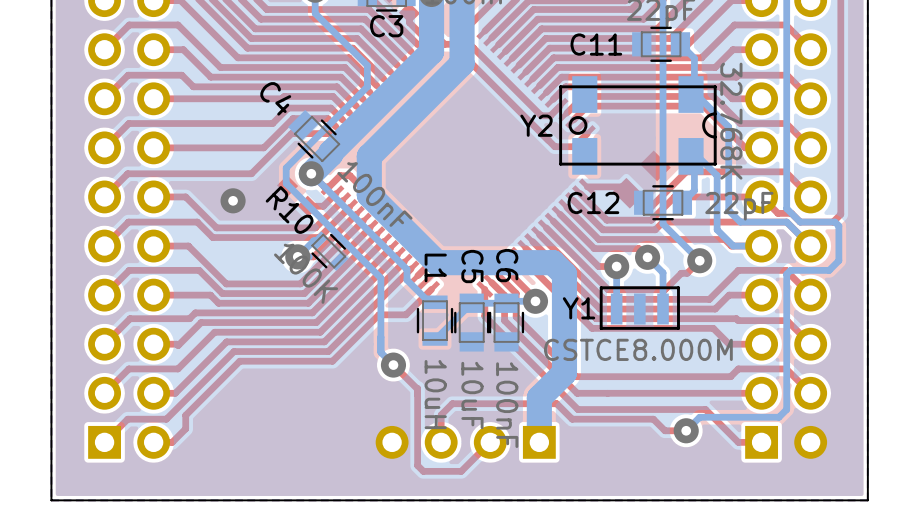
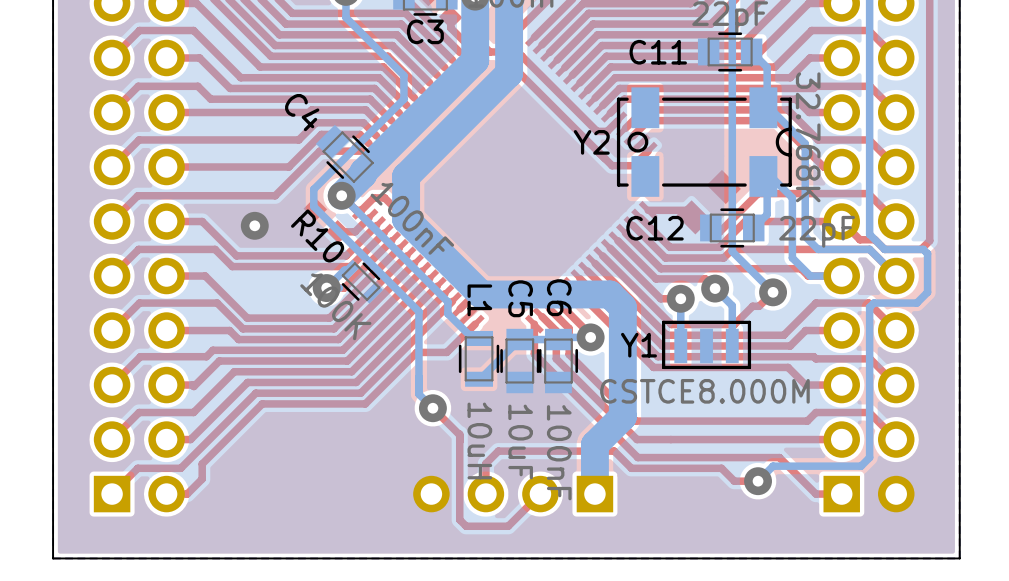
Y2 footprint: [559, 76, 717, 175] -> [616, 87, 792, 197]

